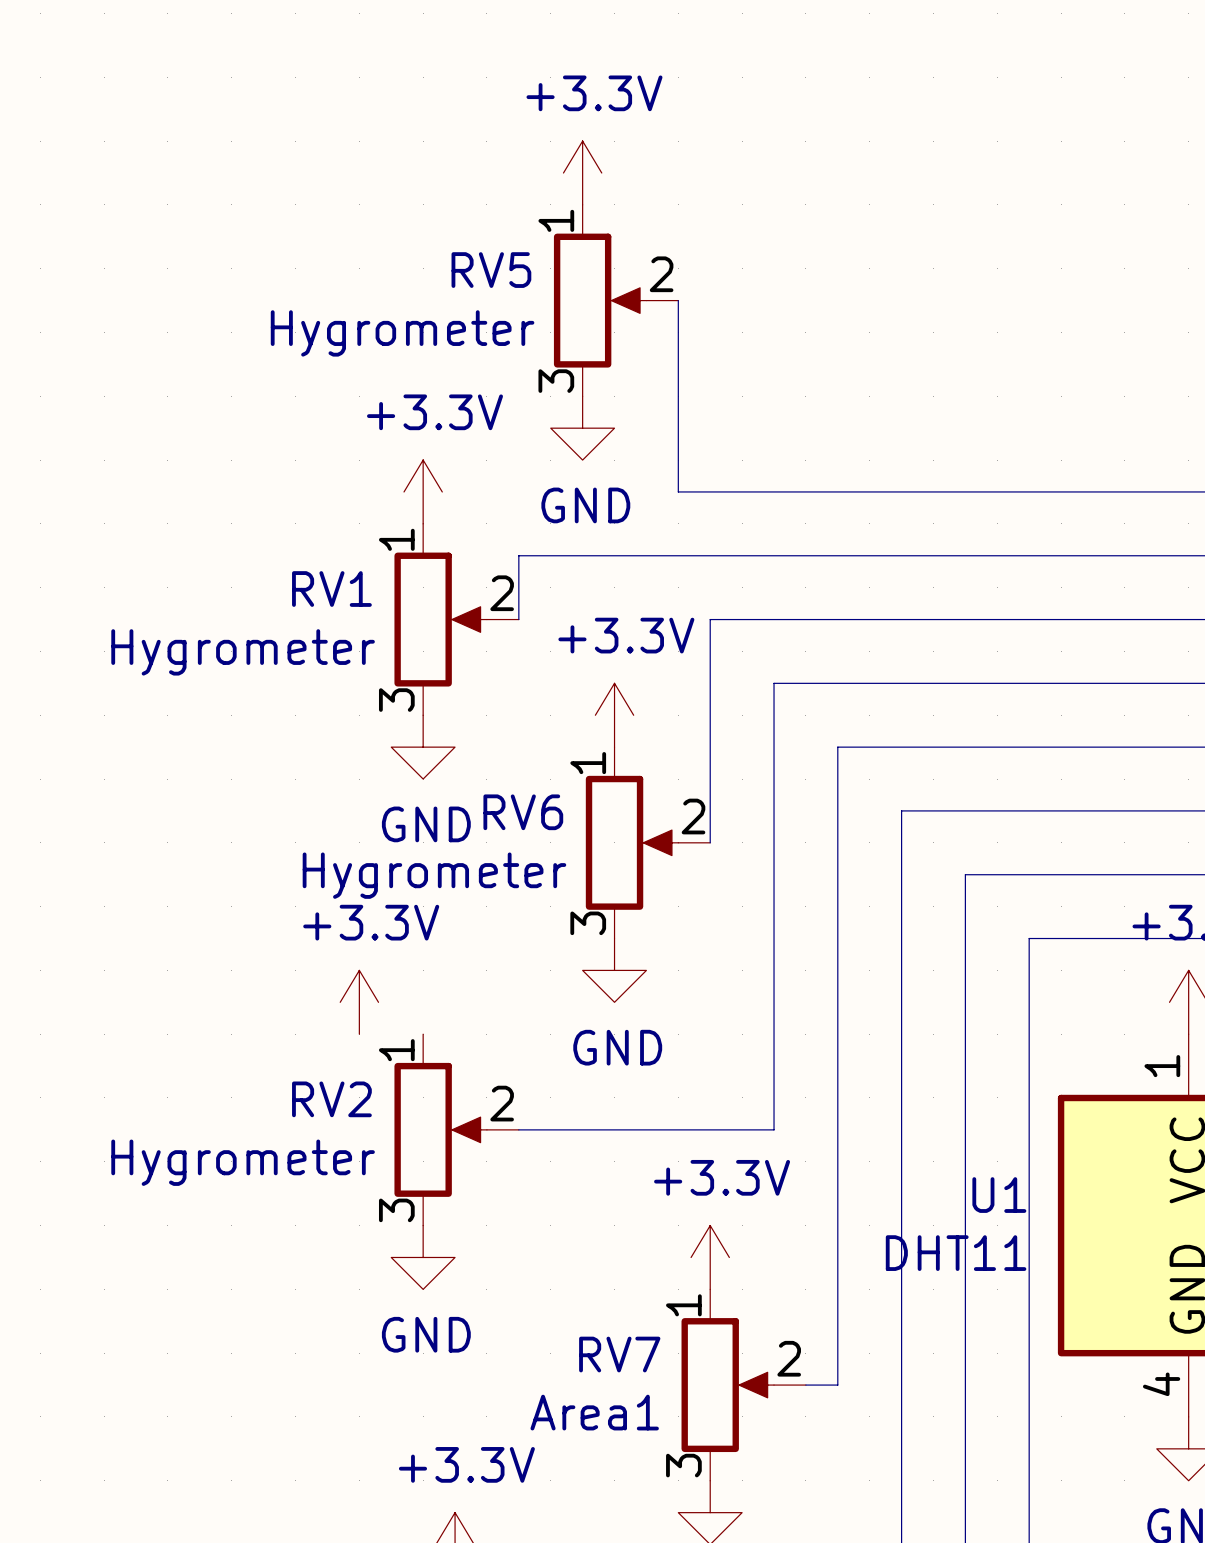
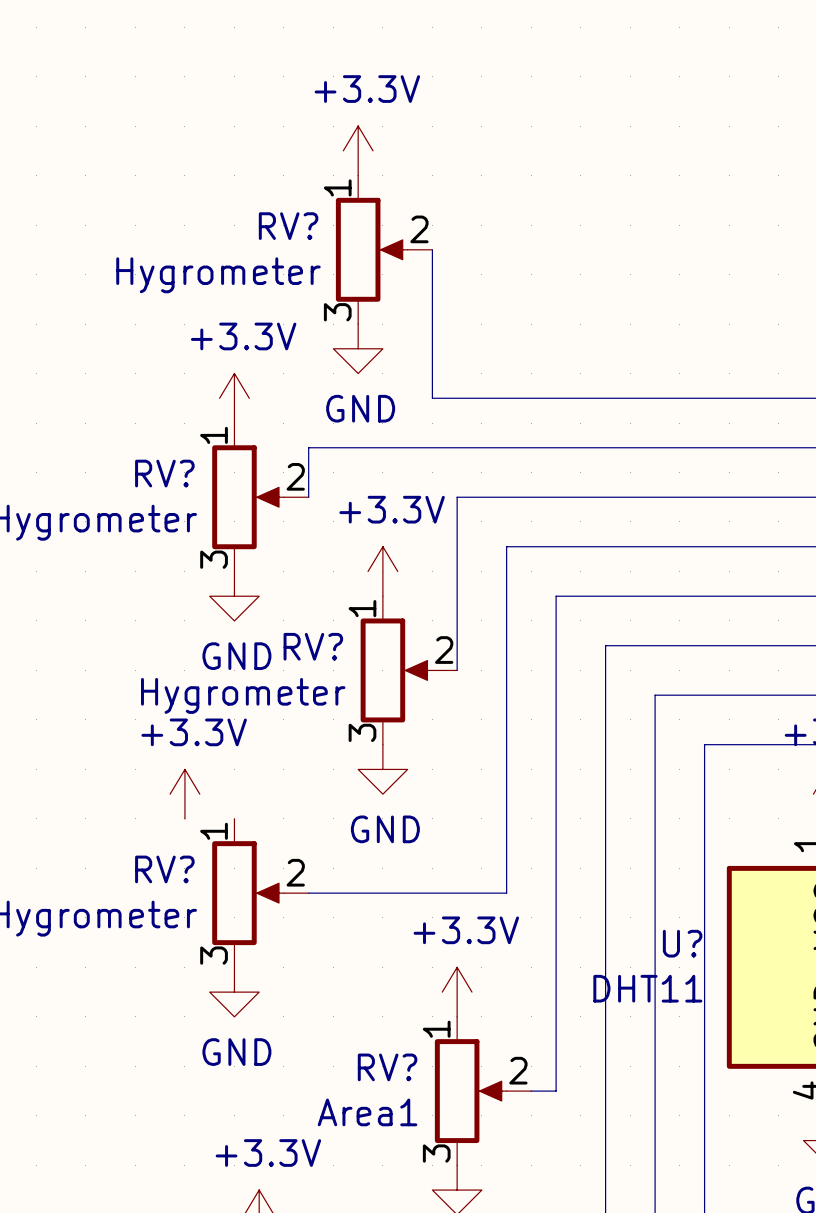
RV5 name: RV5 (491, 270) -> RV? (288, 226)
RV1 name: RV1 (331, 589) -> RV? (164, 473)
RV6 name: RV6 (523, 812) -> RV? (313, 646)
RV2 name: RV2 (331, 1099) -> RV? (164, 869)
U1 name: U1 (999, 1195) -> U? (682, 943)
RV7 name: RV7 (619, 1354) -> RV? (387, 1067)

